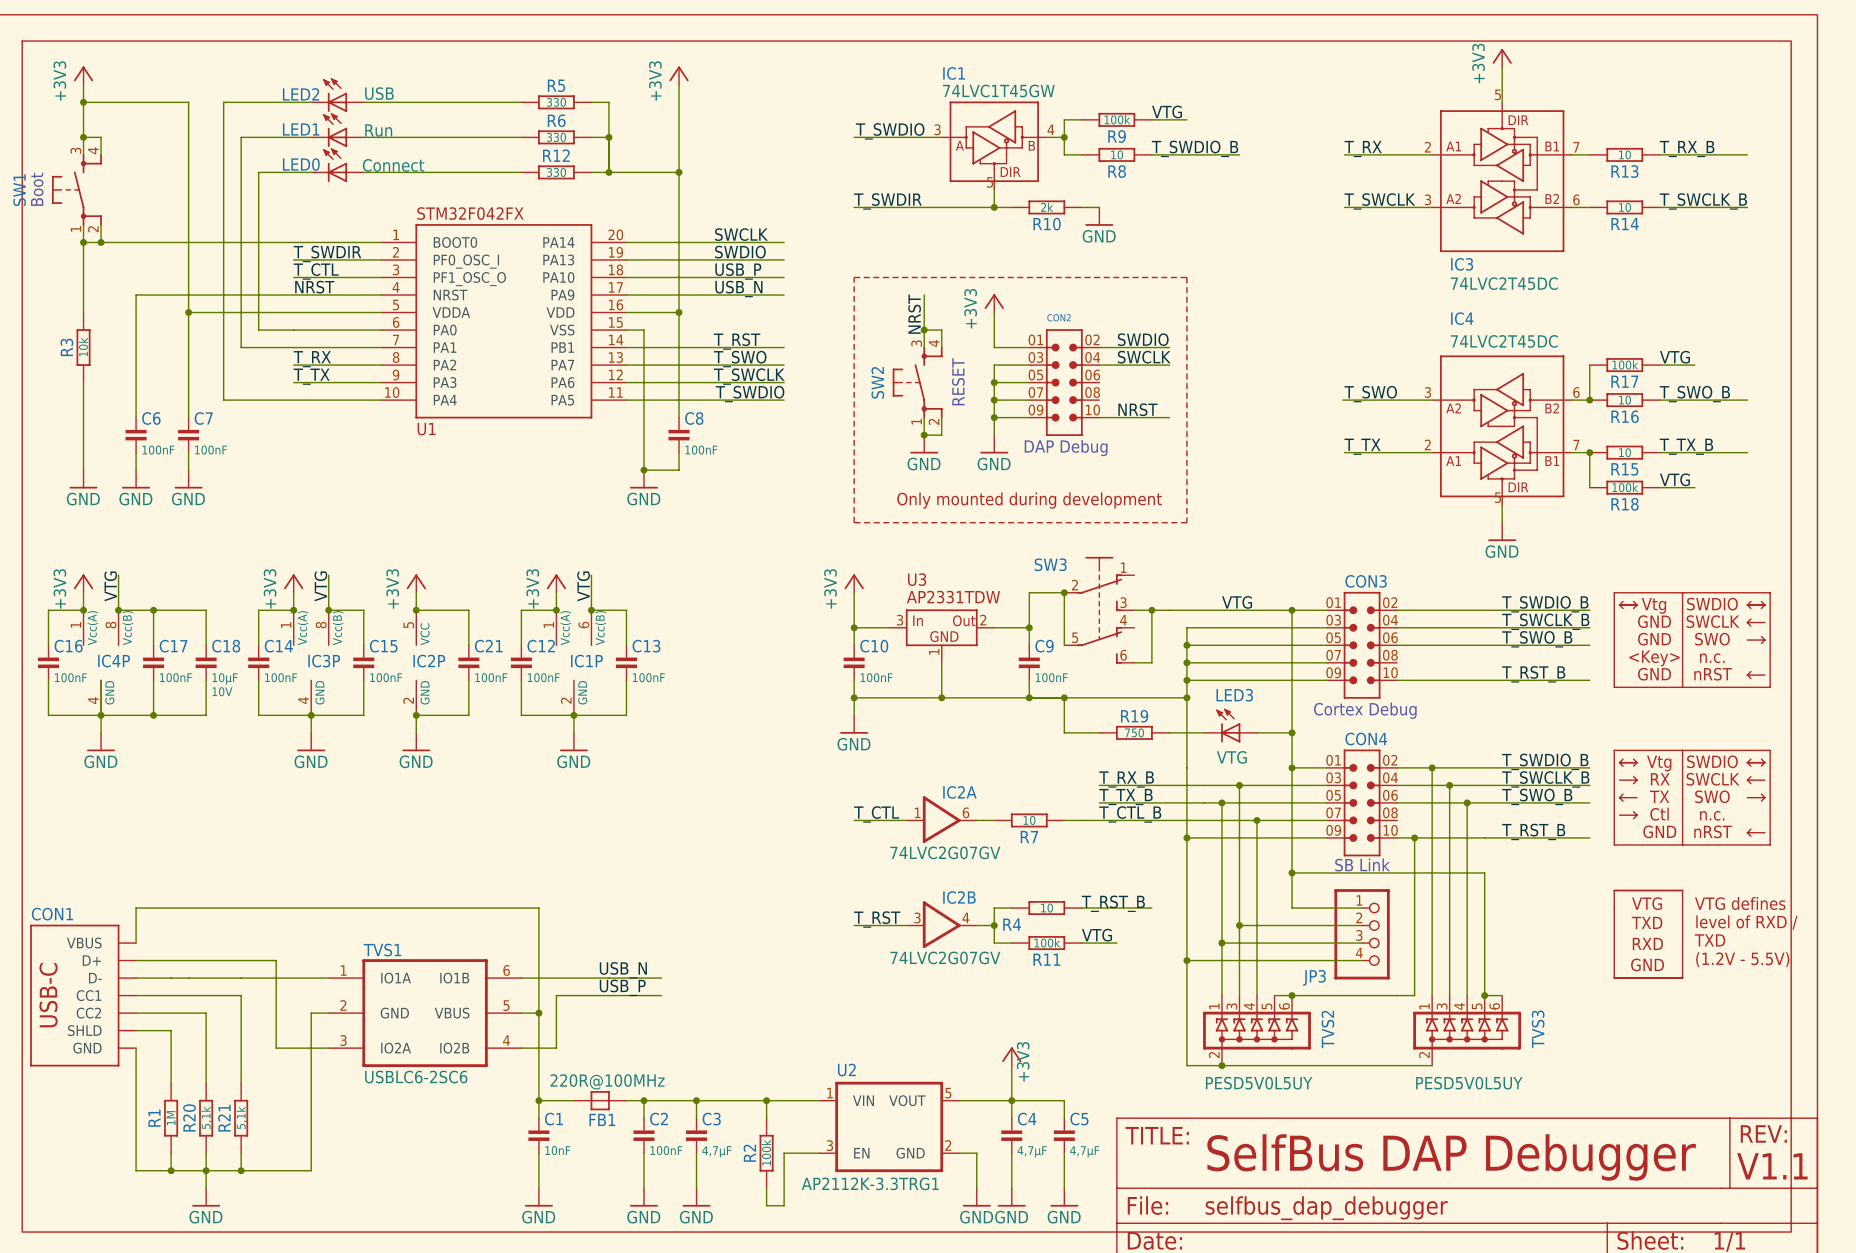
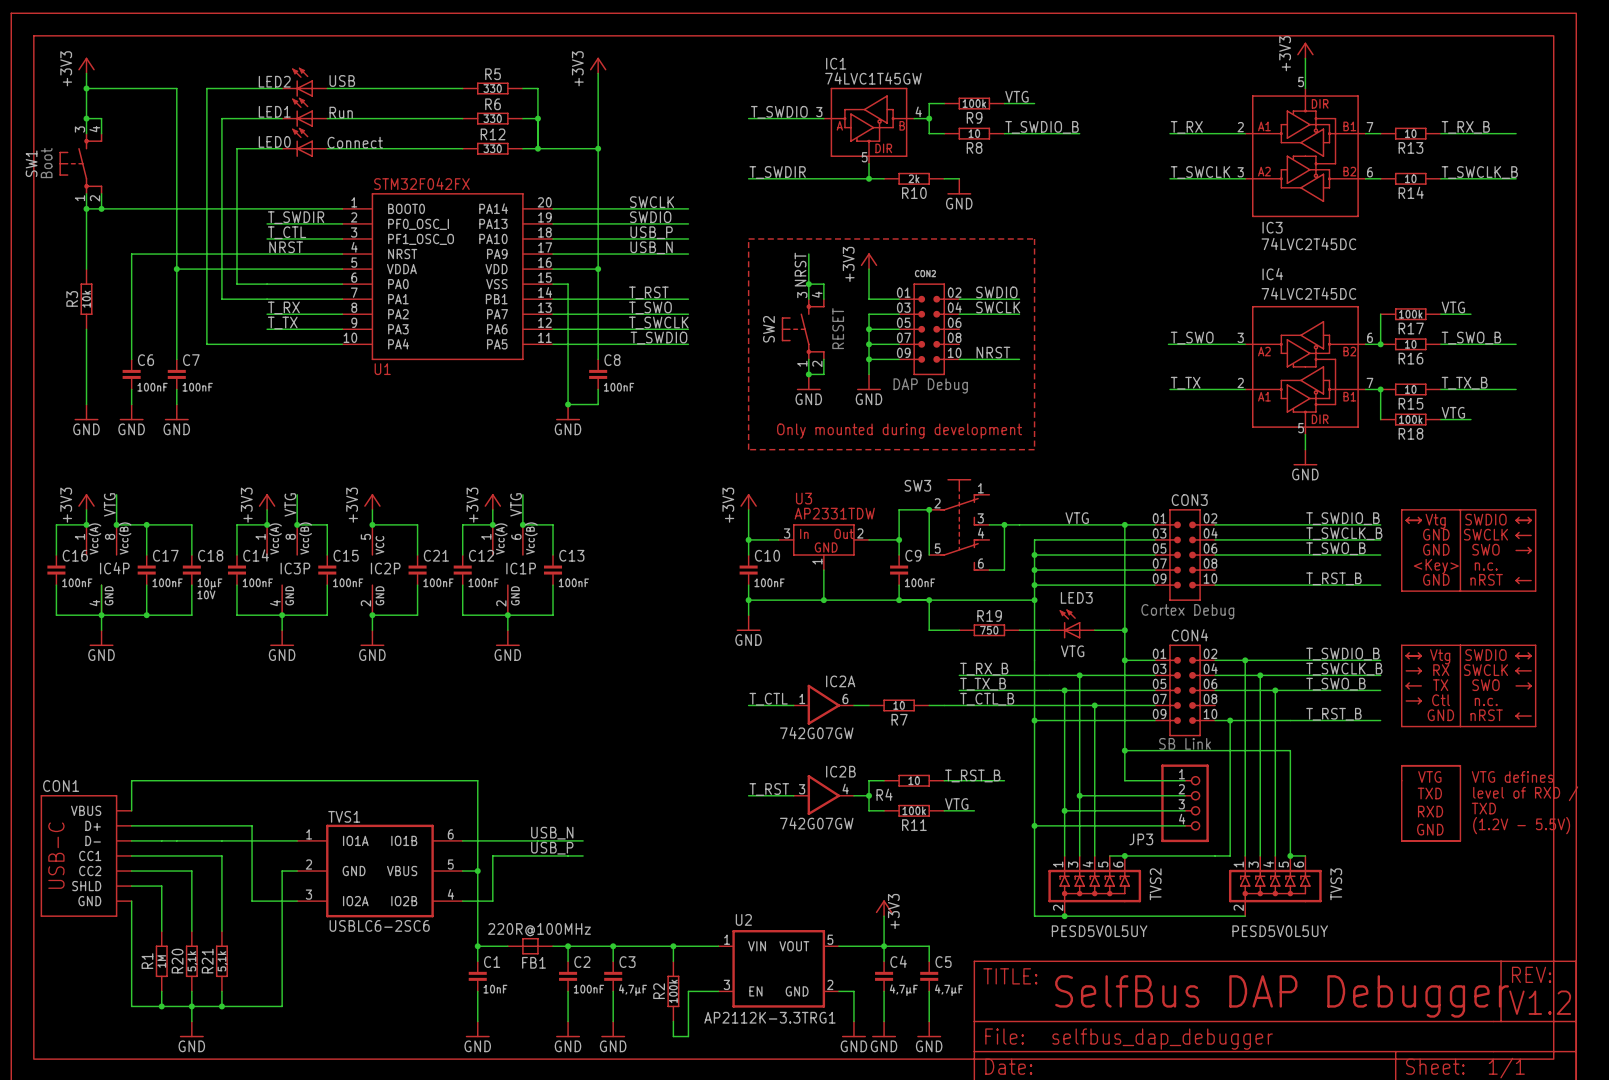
IC2A value: 74LVC2G07GV (945, 852) -> 742G07GW (816, 733)
IC2B value: 74LVC2G07GV (945, 957) -> 742G07GW (816, 823)
text: V1.1 (1772, 1166) -> V1.2 (1540, 1002)

